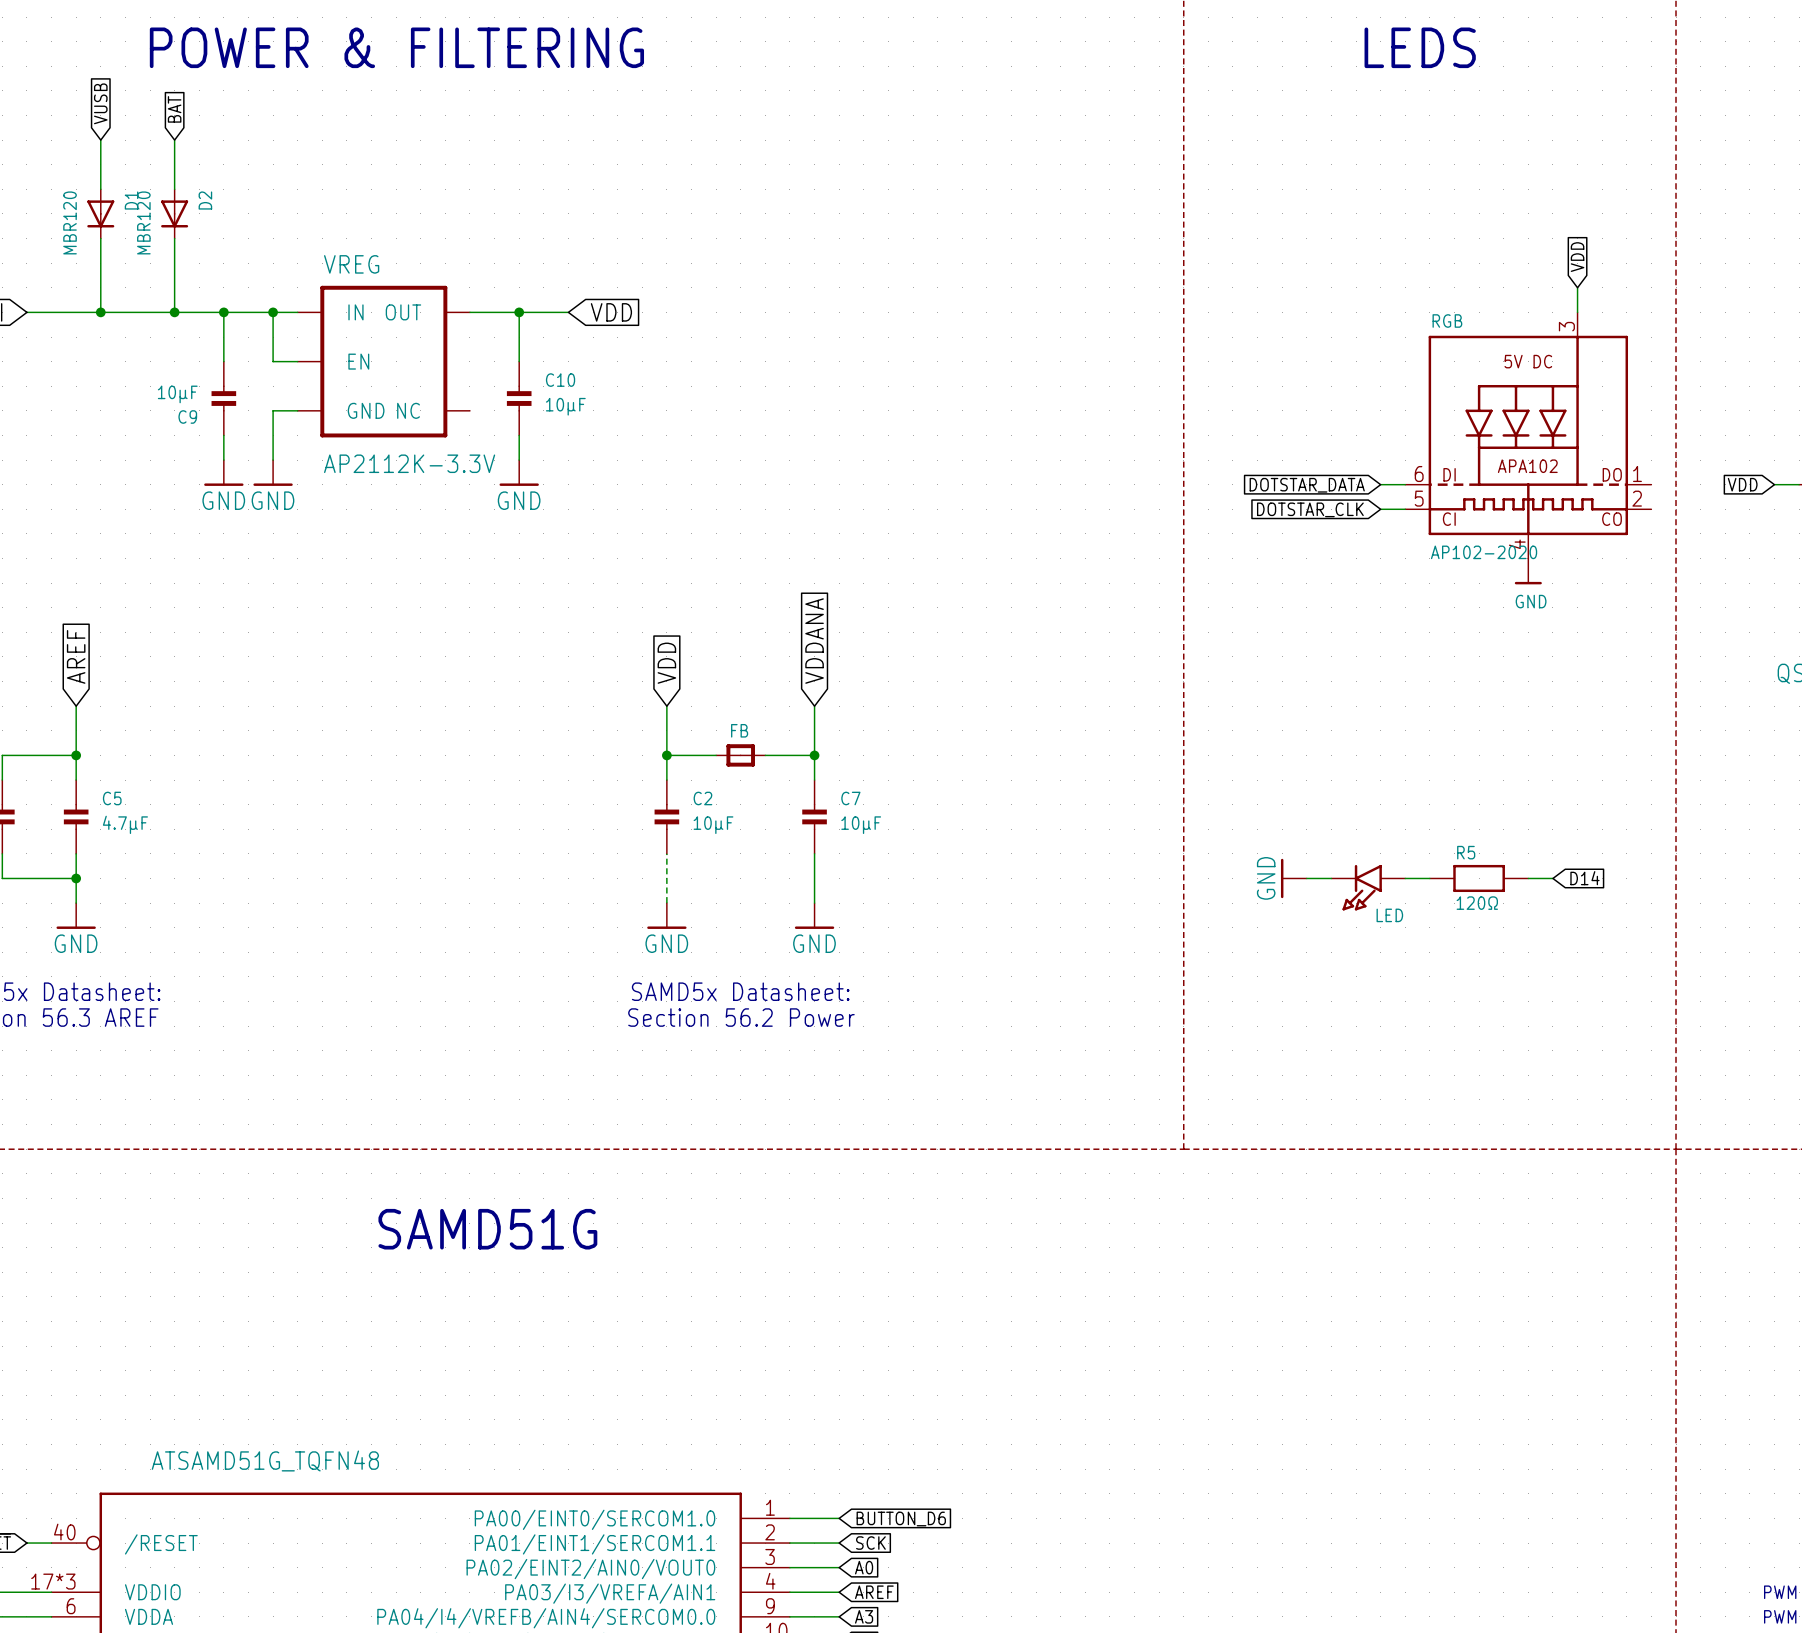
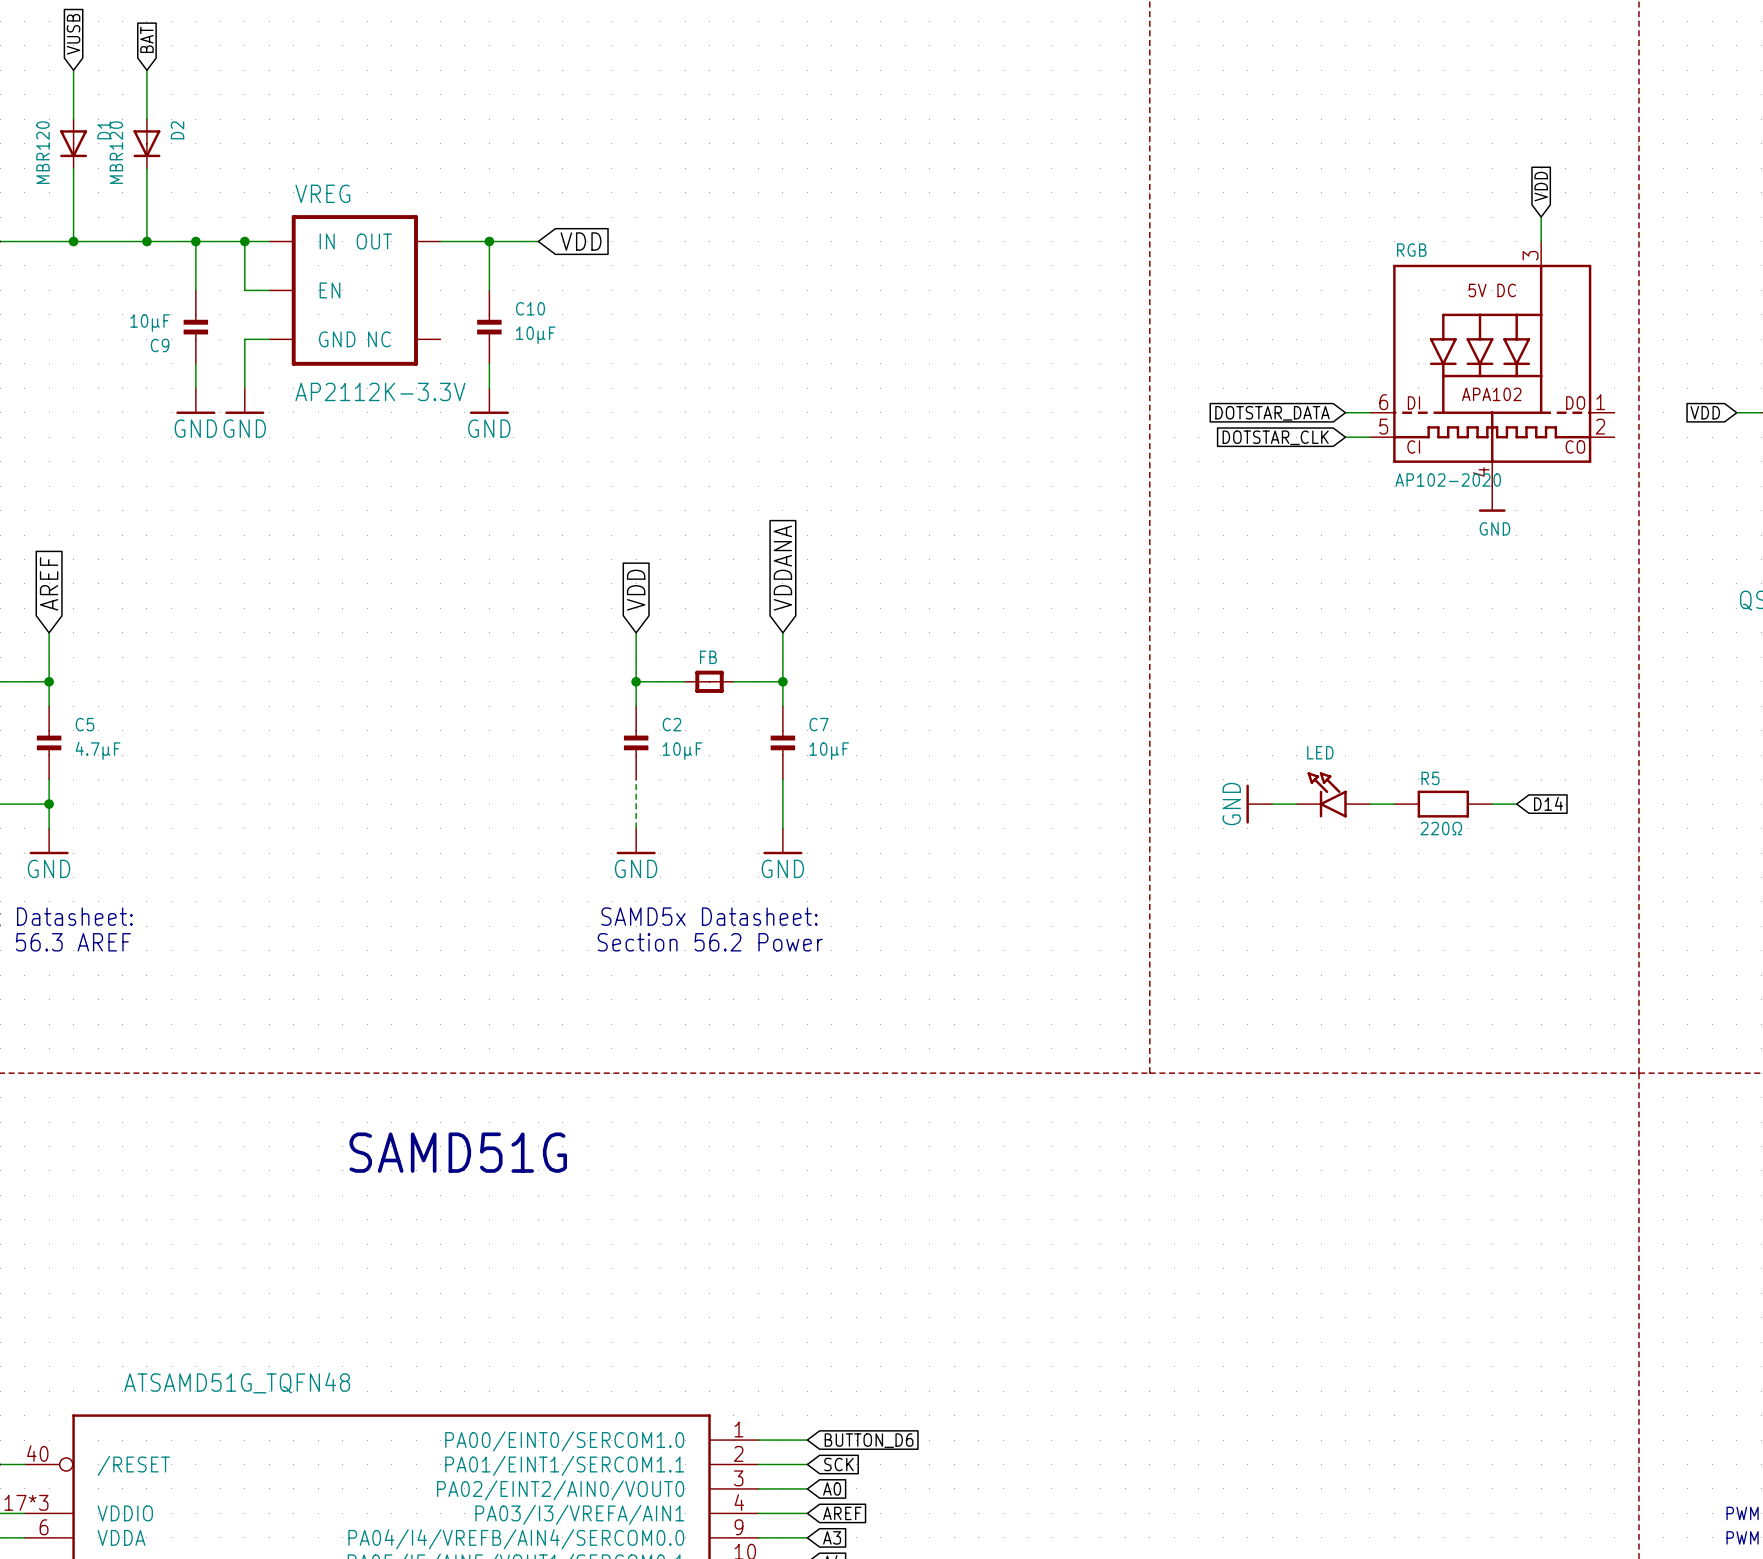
LED: none -> (1333, 794)
LED: (1368, 887) -> none
R5 value: 120Ω (1477, 903) -> 220Ω (1441, 828)

